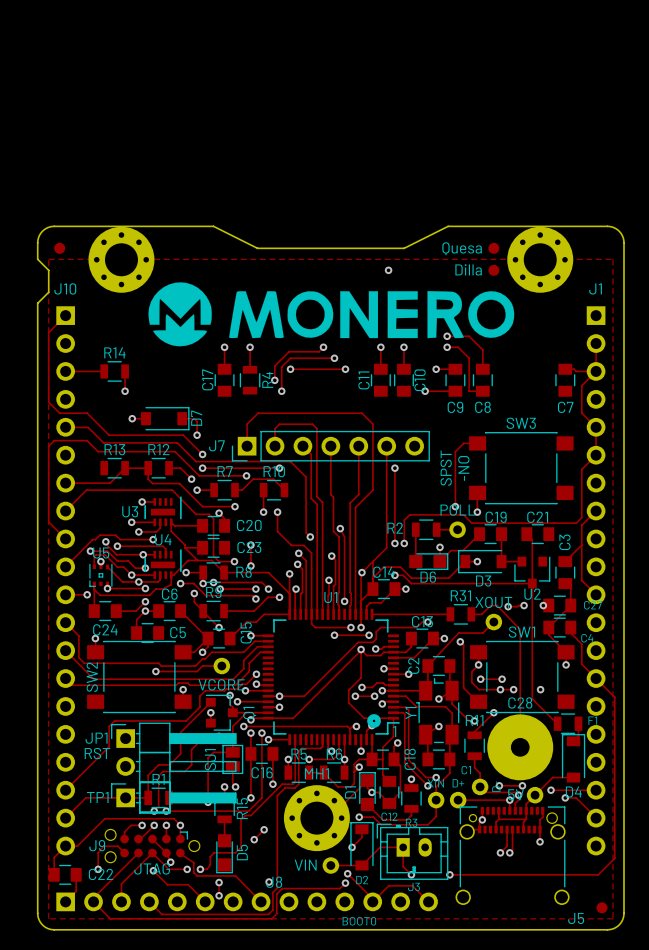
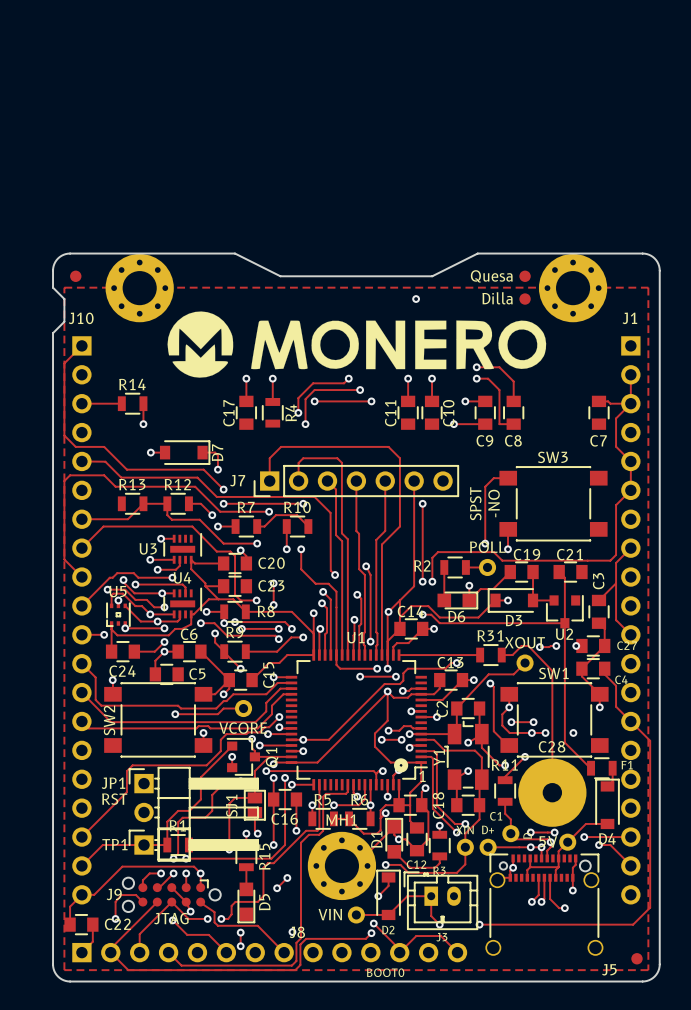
via: none -> (530, 847)
track: none -> (550, 877) (550, 899) (559, 908) (564, 908)
via: none -> (564, 908)

